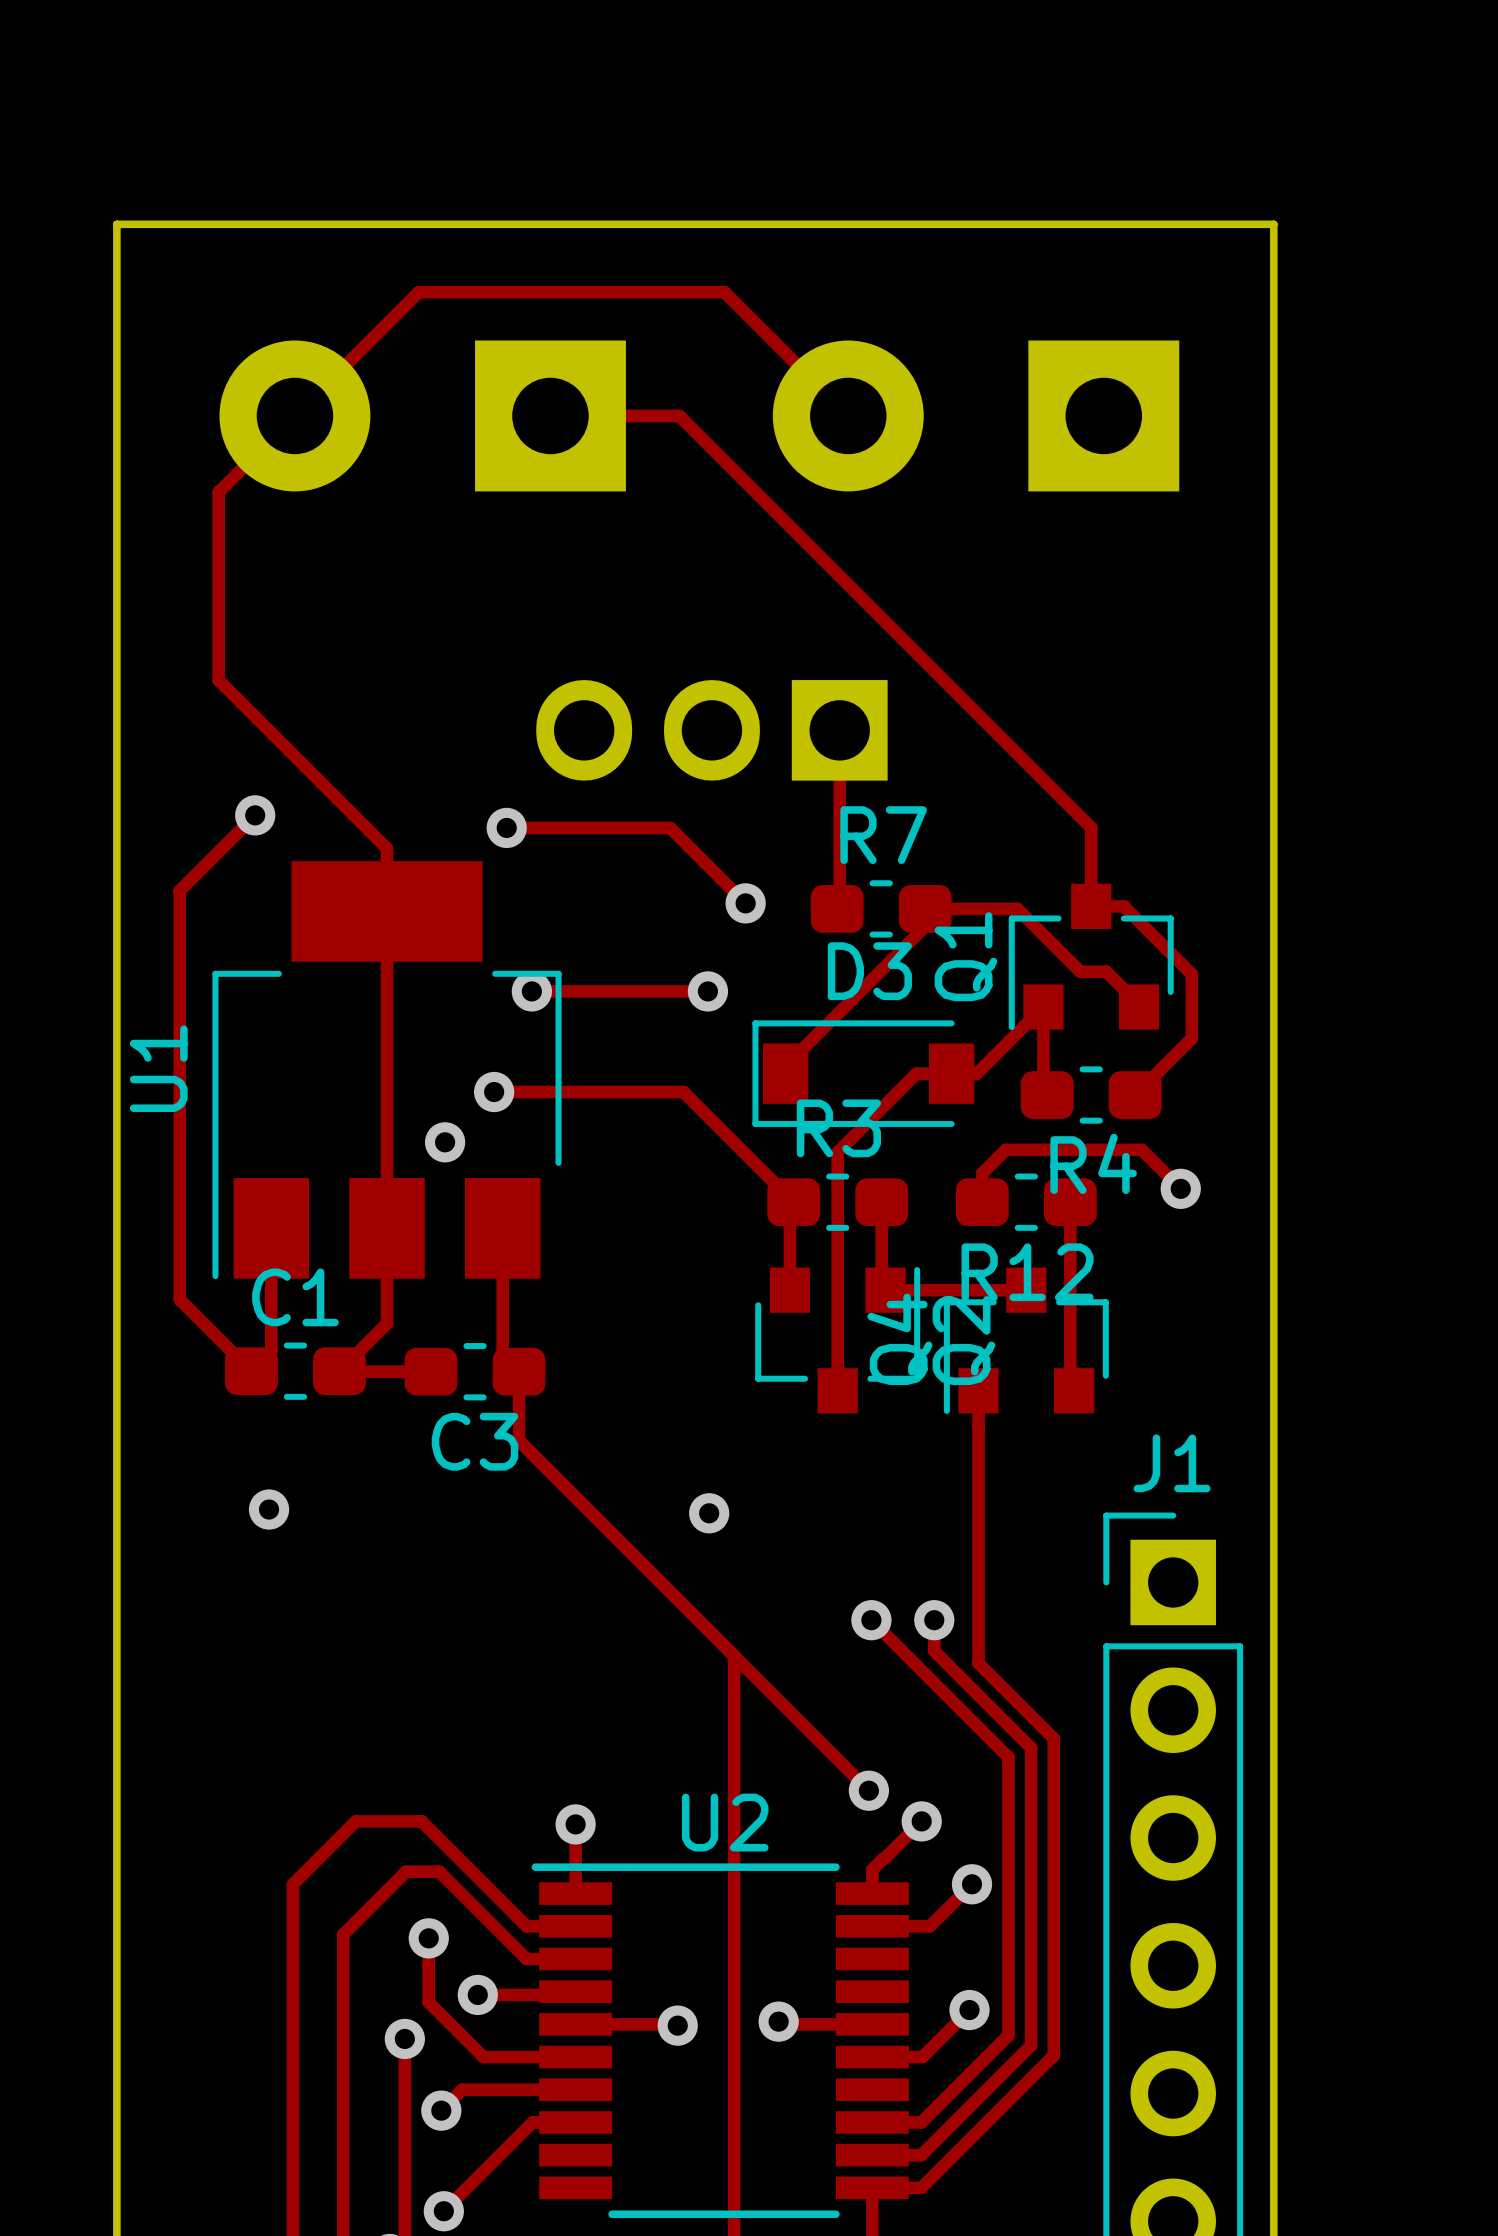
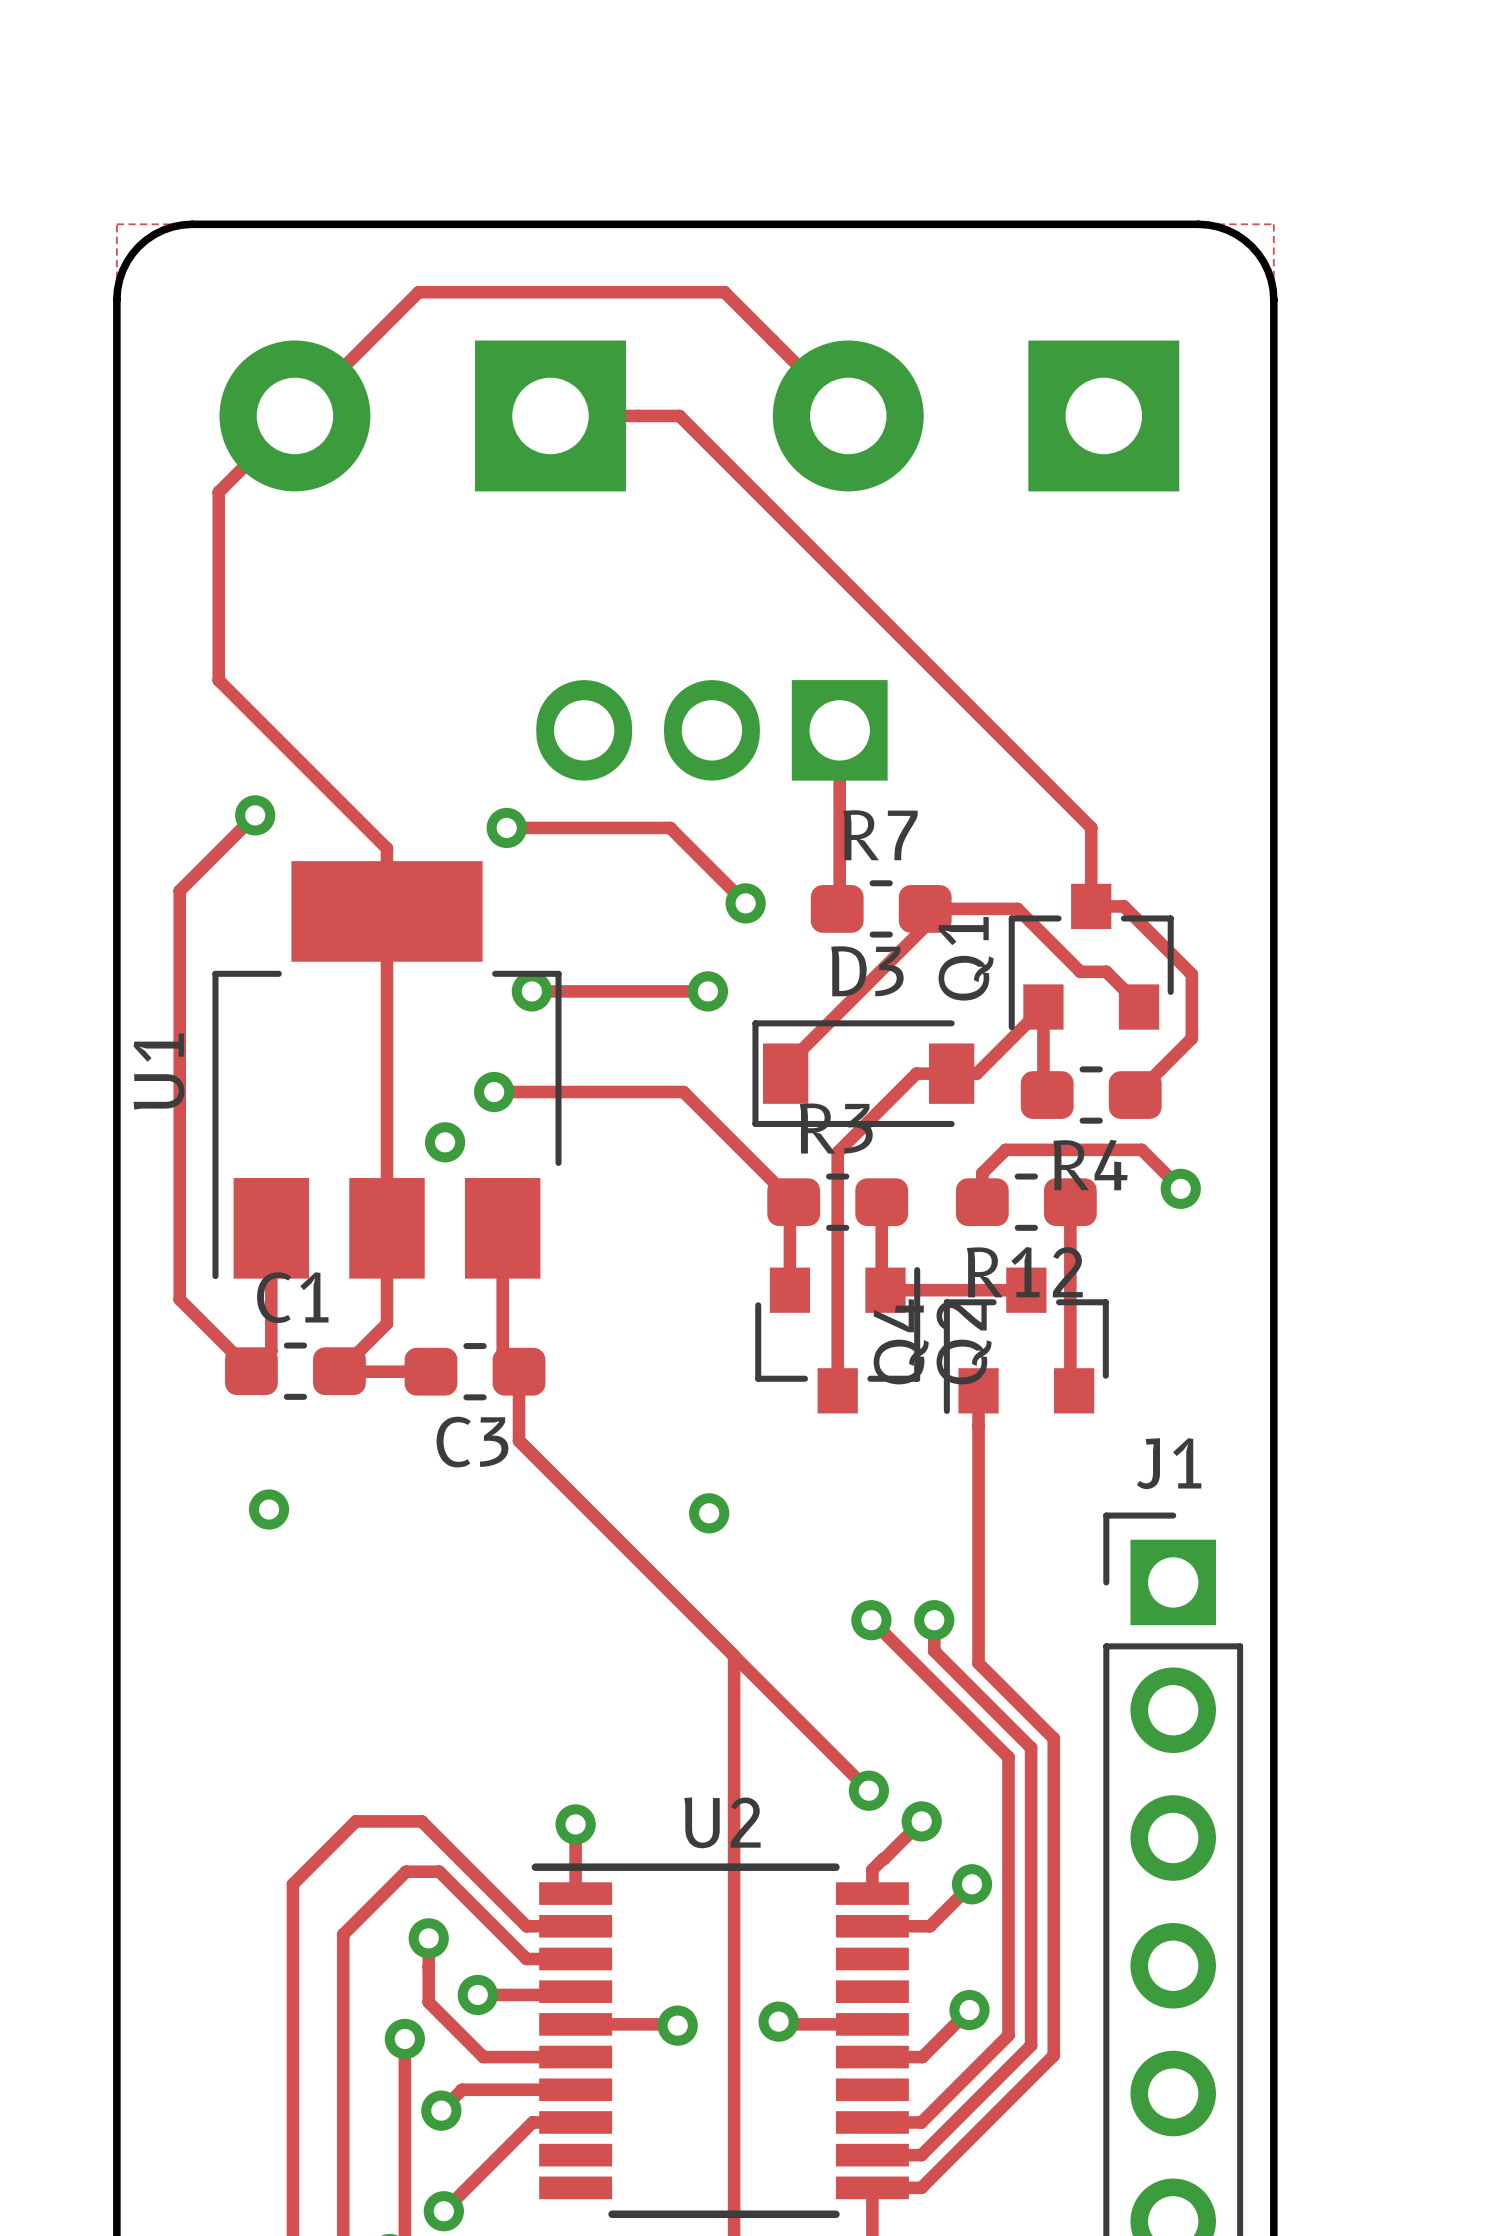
board edge: (192, 224) (116, 224) (116, 299) -> (192, 224) (163, 230) (138, 246) (122, 270) (116, 299)
board edge: (1198, 224) (1273, 224) (1273, 299) -> (1198, 224) (1227, 230) (1251, 246) (1268, 270) (1273, 299)

